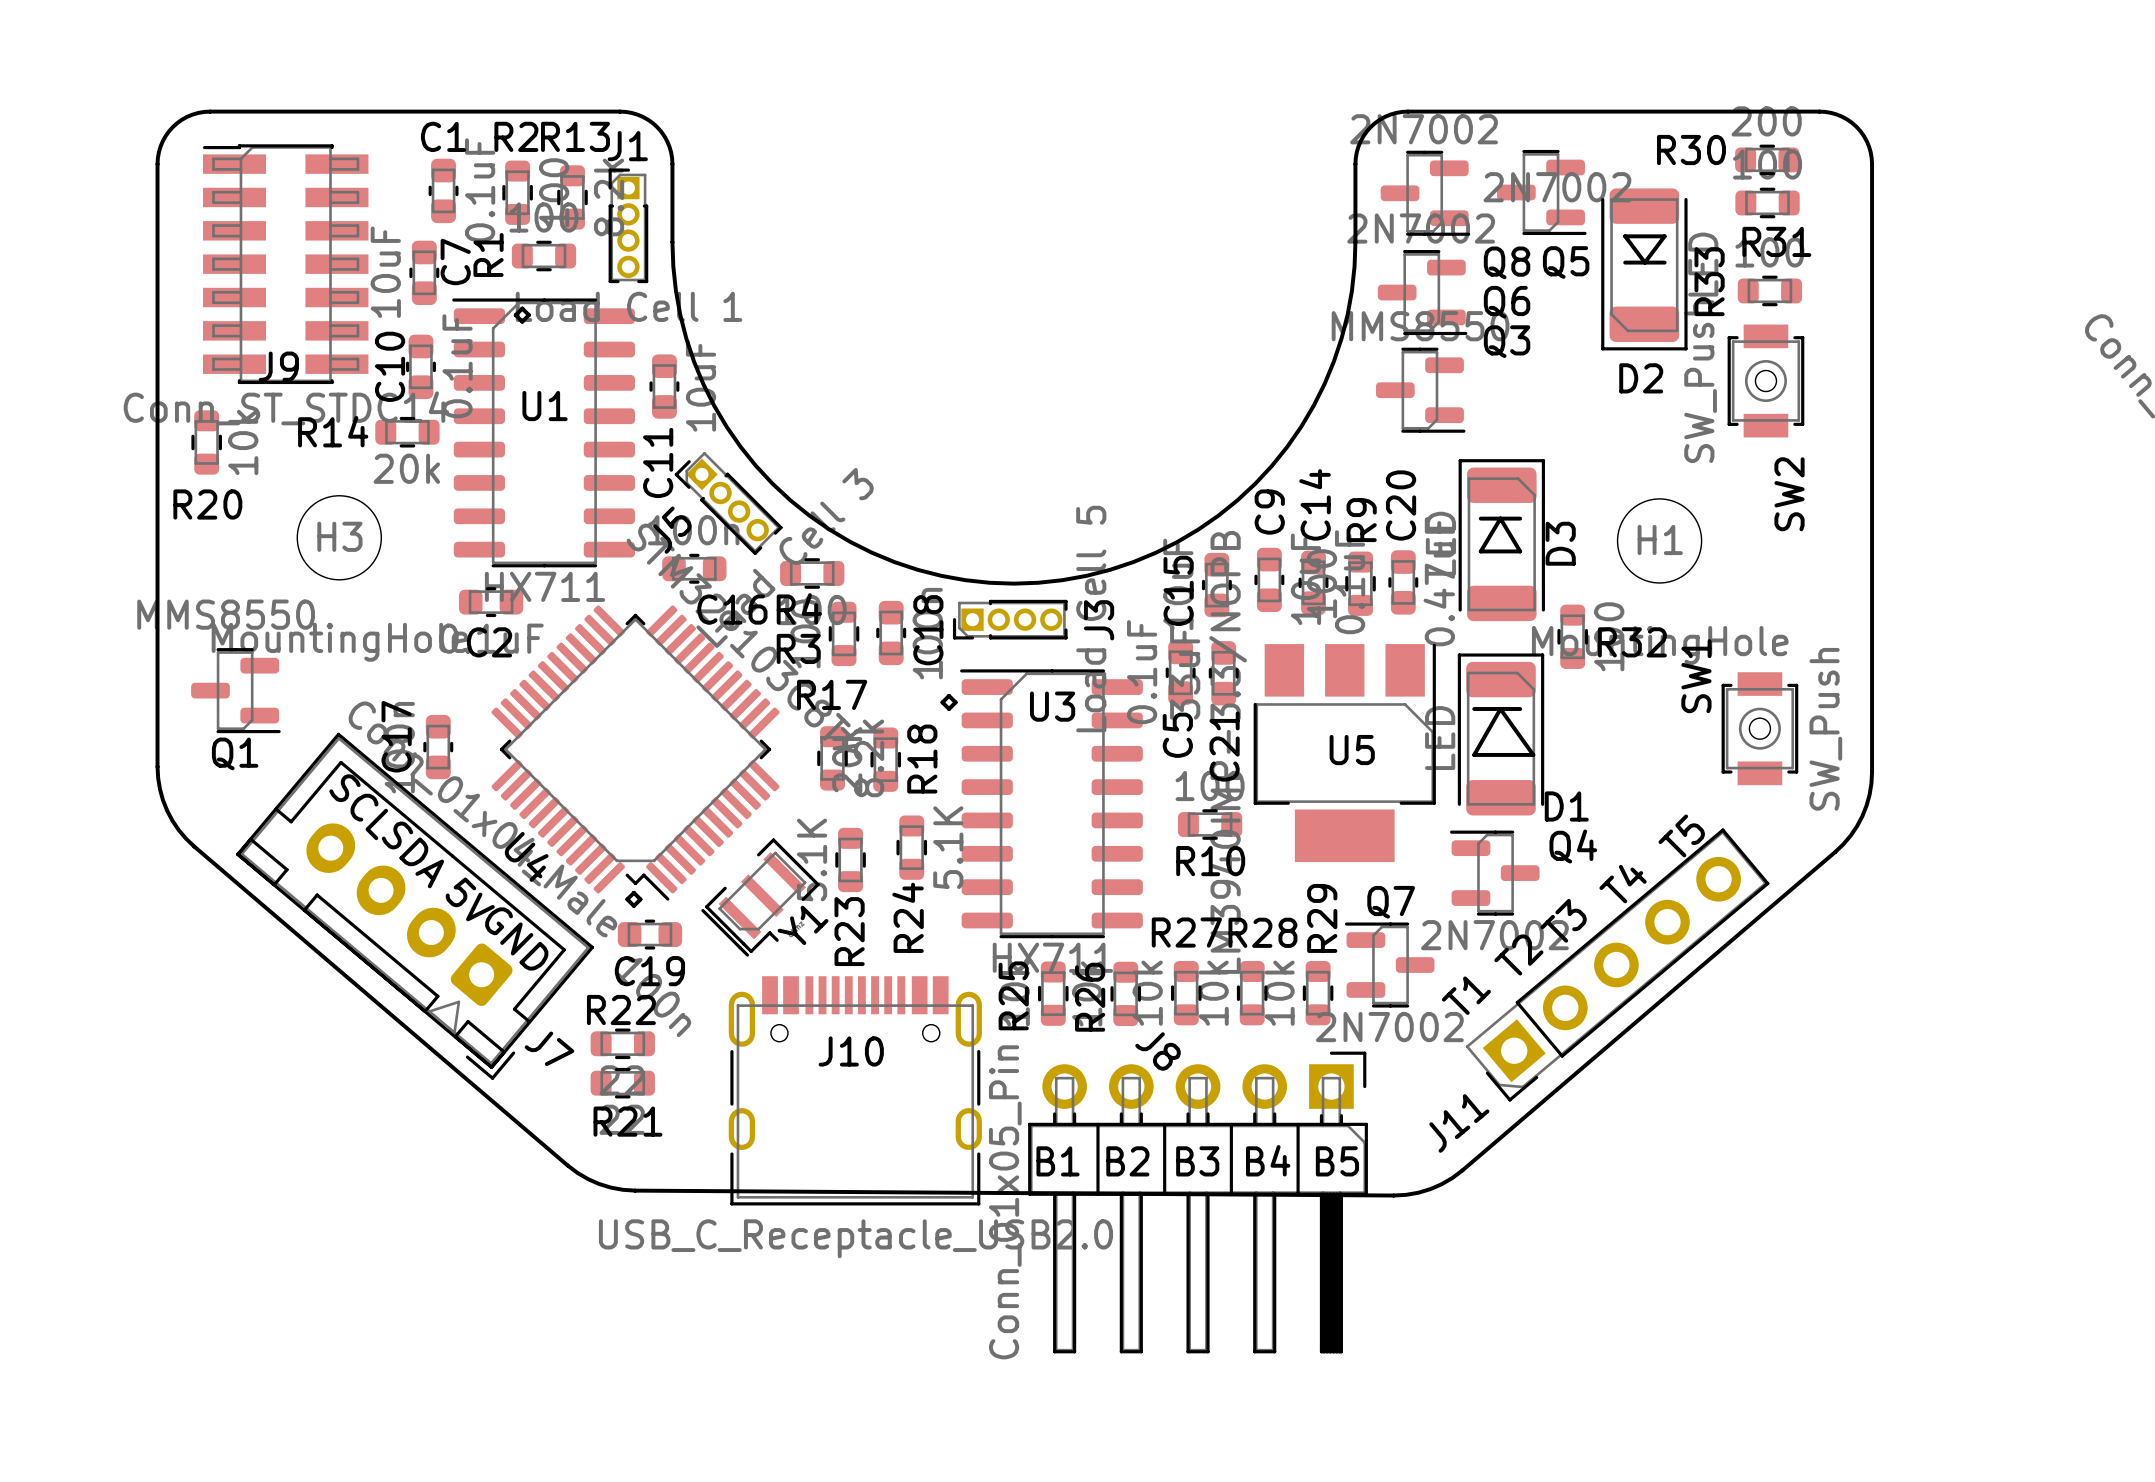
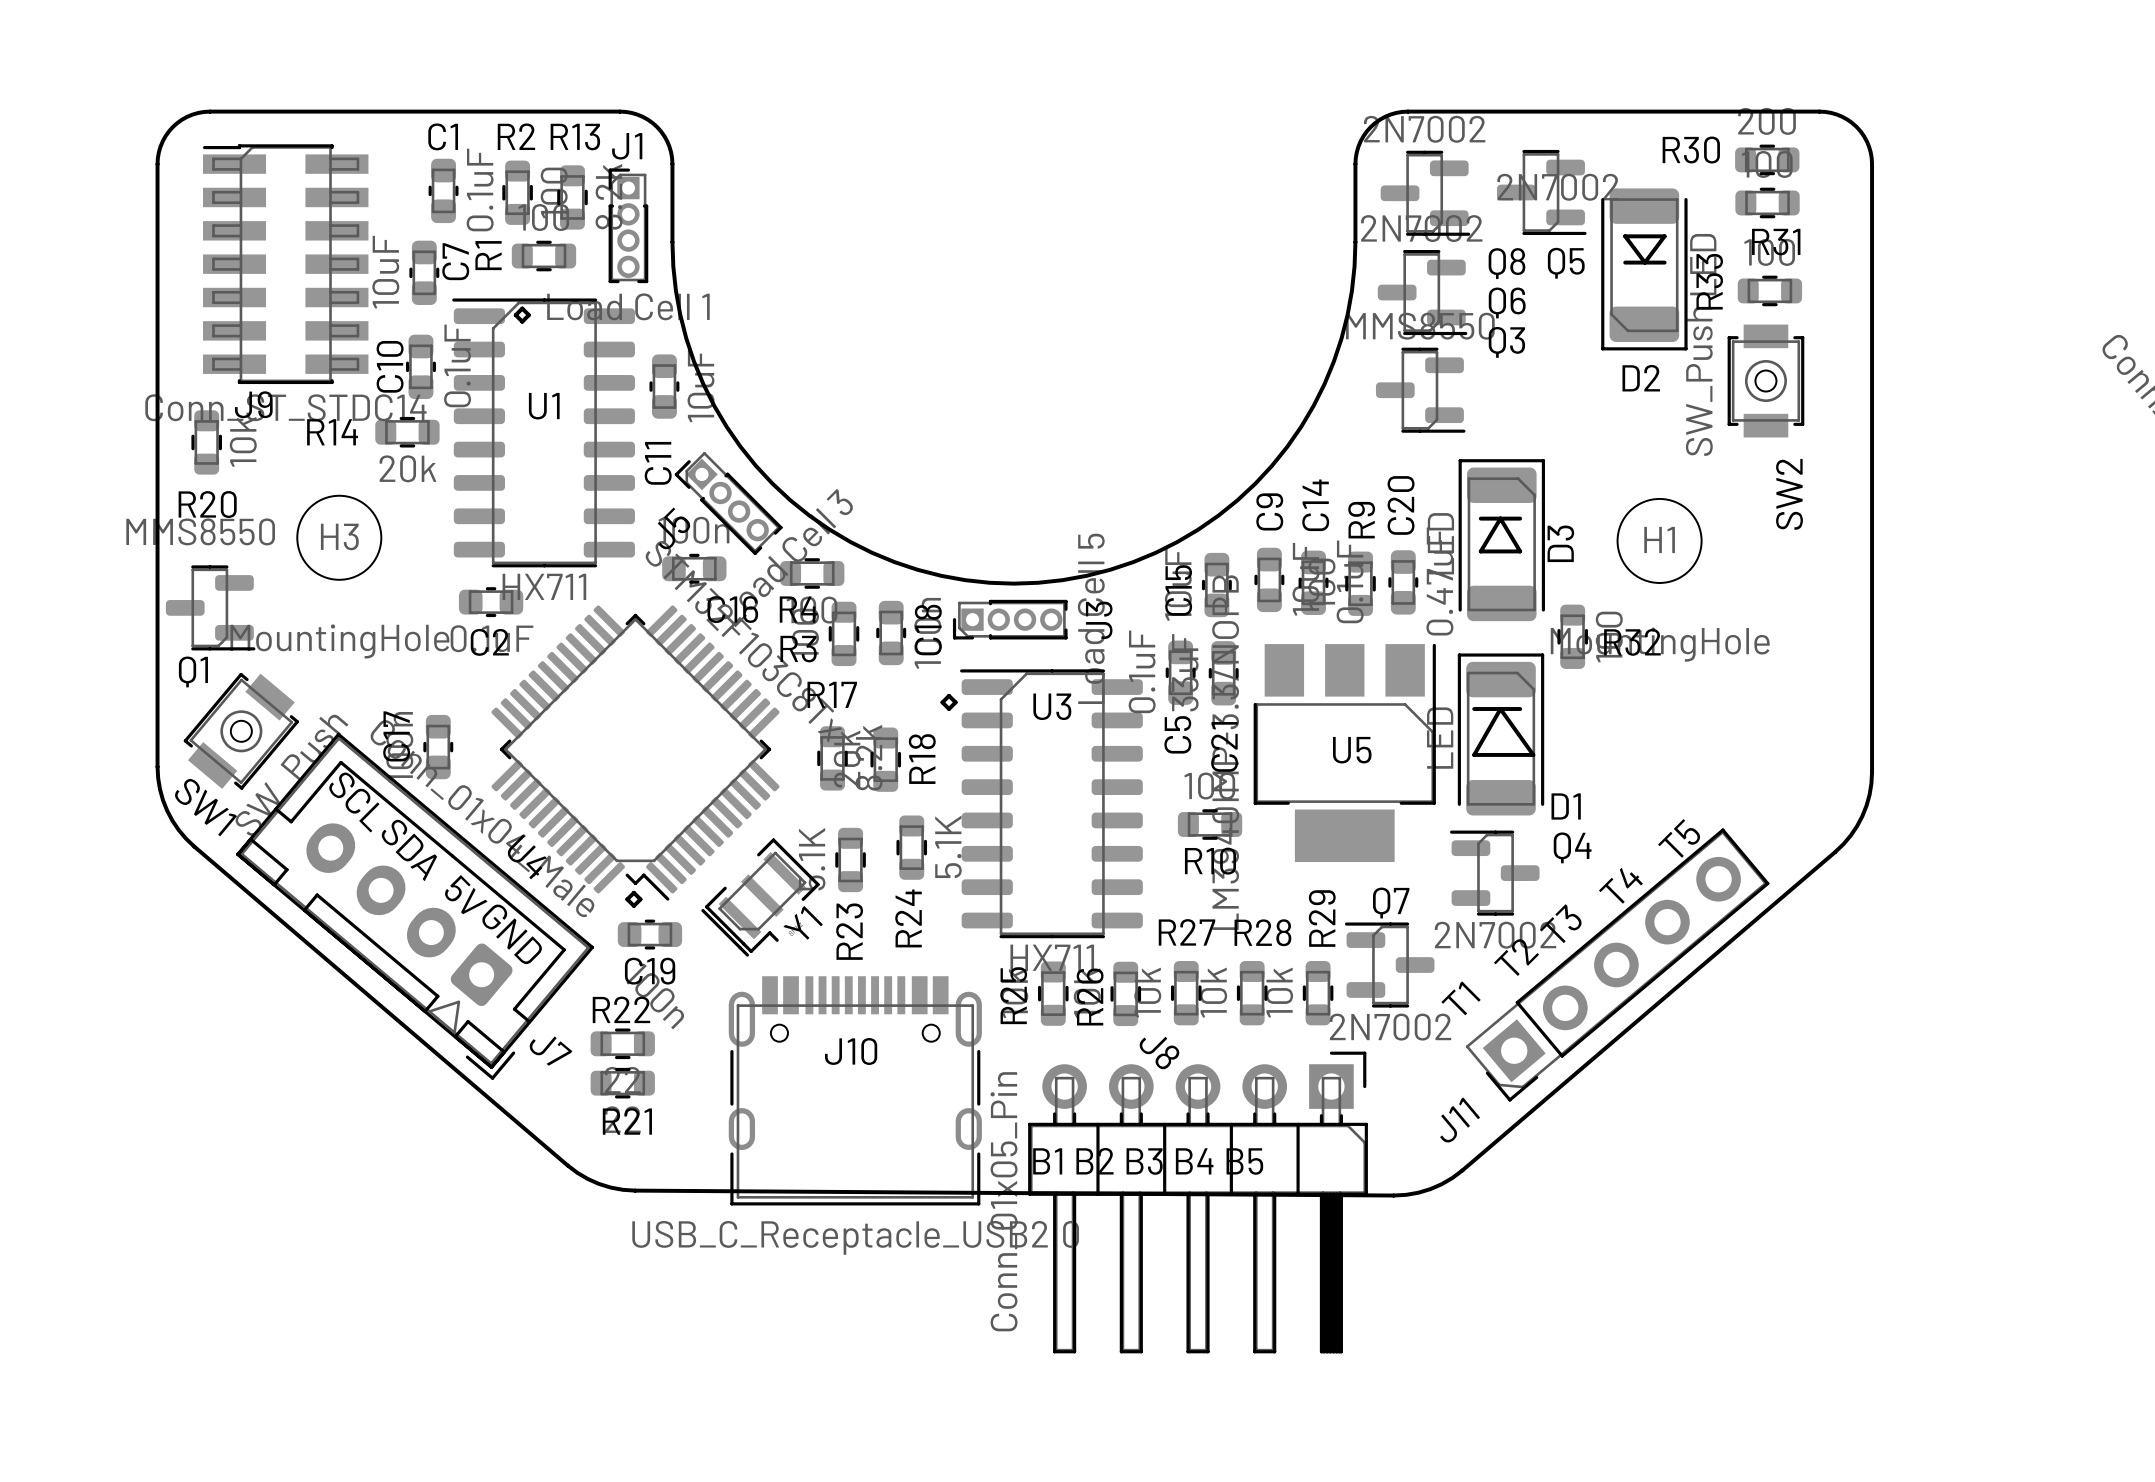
J9 name position: J9 (278, 366) -> J9 (253, 404)
SW1 name position: SW1 (1696, 676) -> SW1 (205, 807)
Q1 position: (235, 690) -> (210, 607)
SW1 rotation: 0° (1759, 728) -> 40° clockwise (241, 731)
SW1 position: (1759, 728) -> (241, 731)
Q1 name position: Q1 (235, 753) -> Q1 (193, 671)

